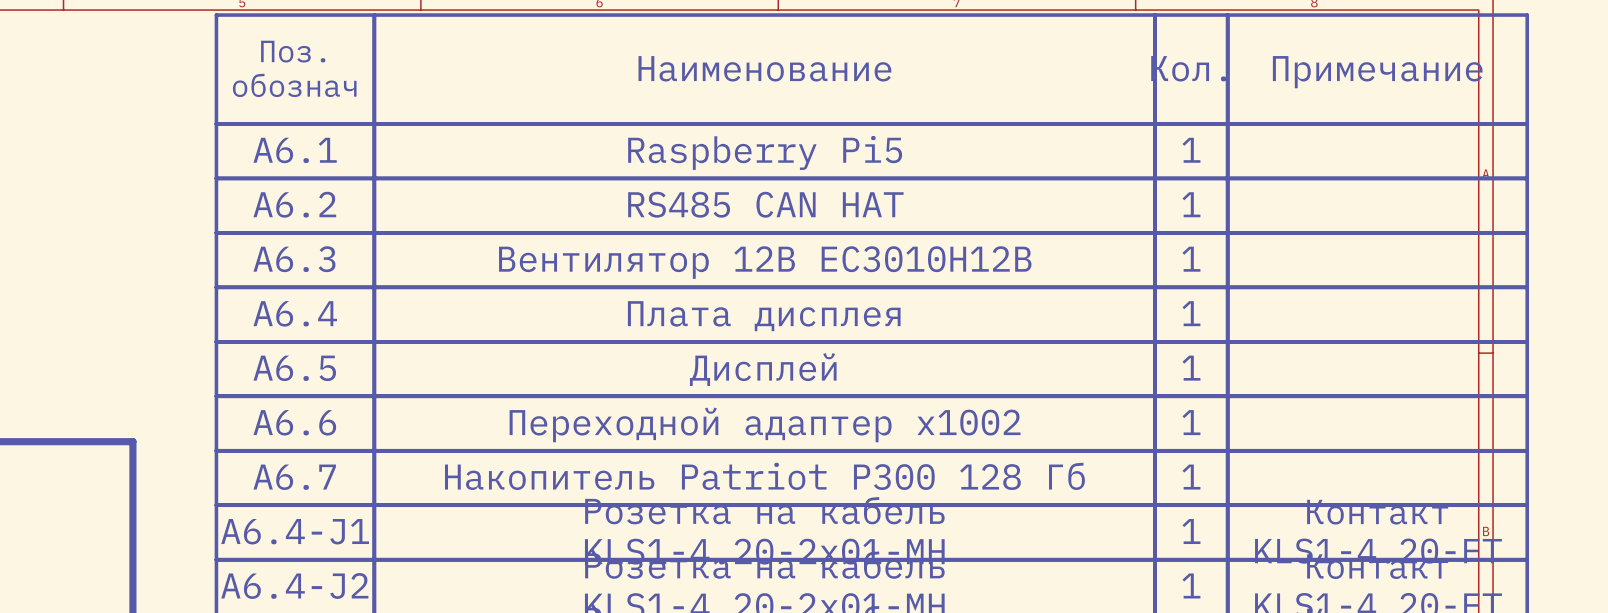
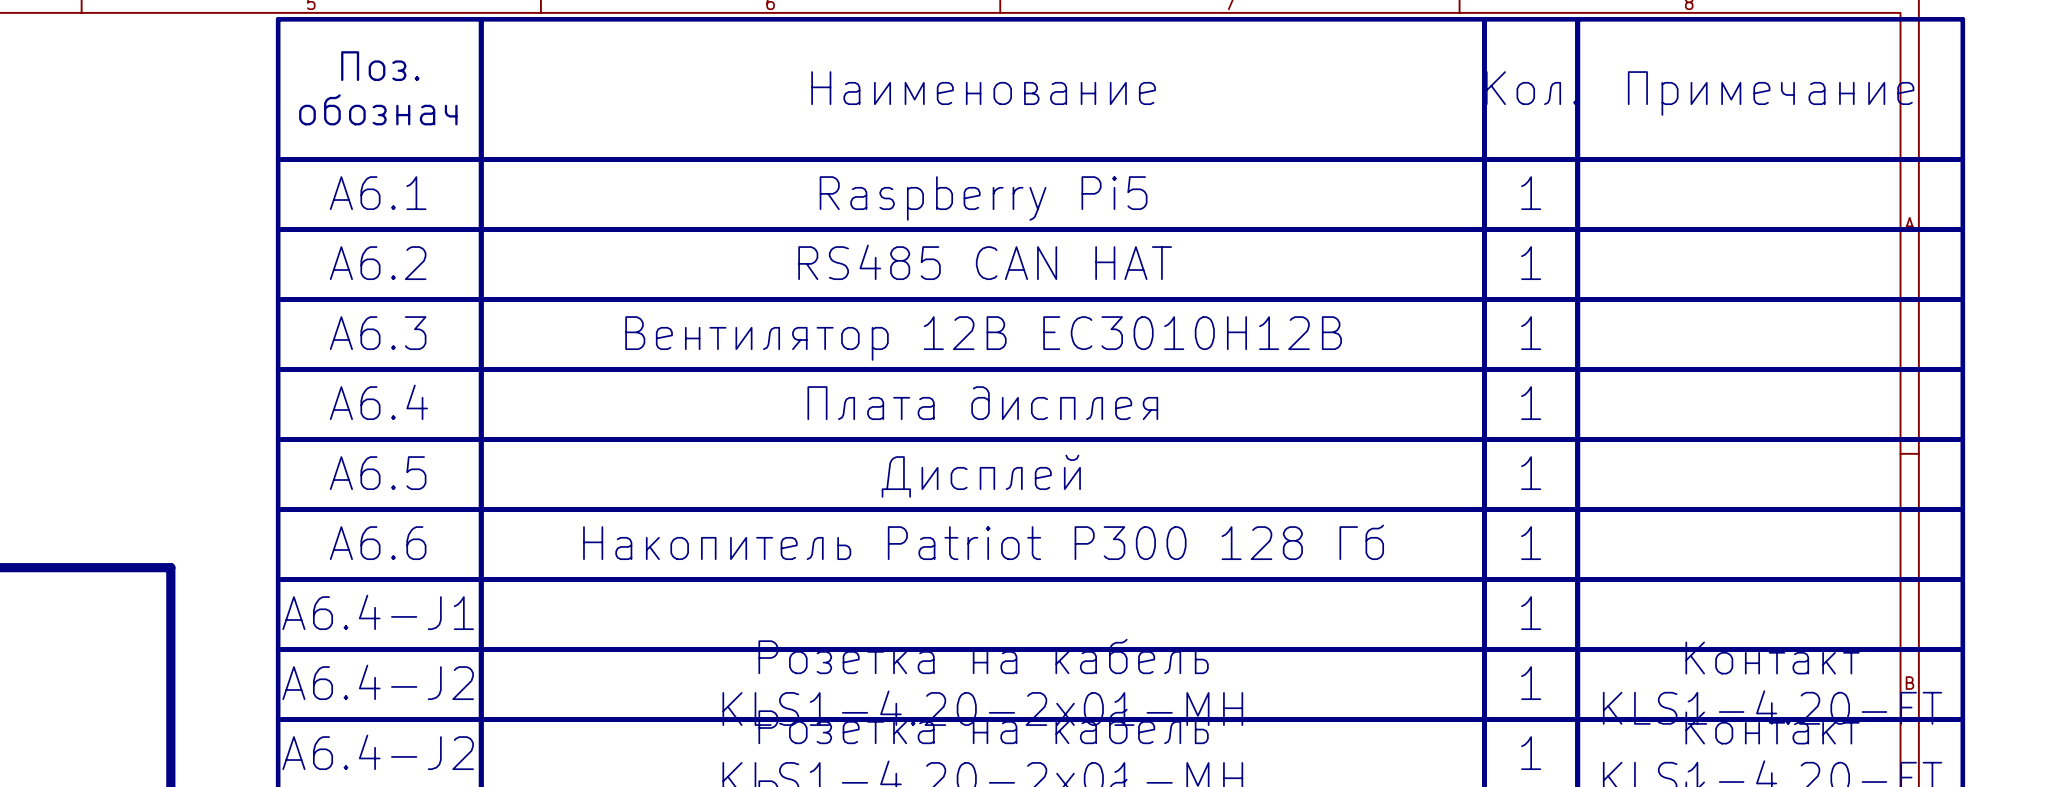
text: Переходной адаптер х1002 (765, 424) -> Накопитель Patriot P300 128 Гб (983, 542)
text: Накопитель Patriot P300 128 Гб (764, 476) -> none
text: А6.7 (294, 477) -> А6.4-J1 (378, 612)
text: А6.4-J1 (295, 531) -> А6.4-J2 (378, 682)

